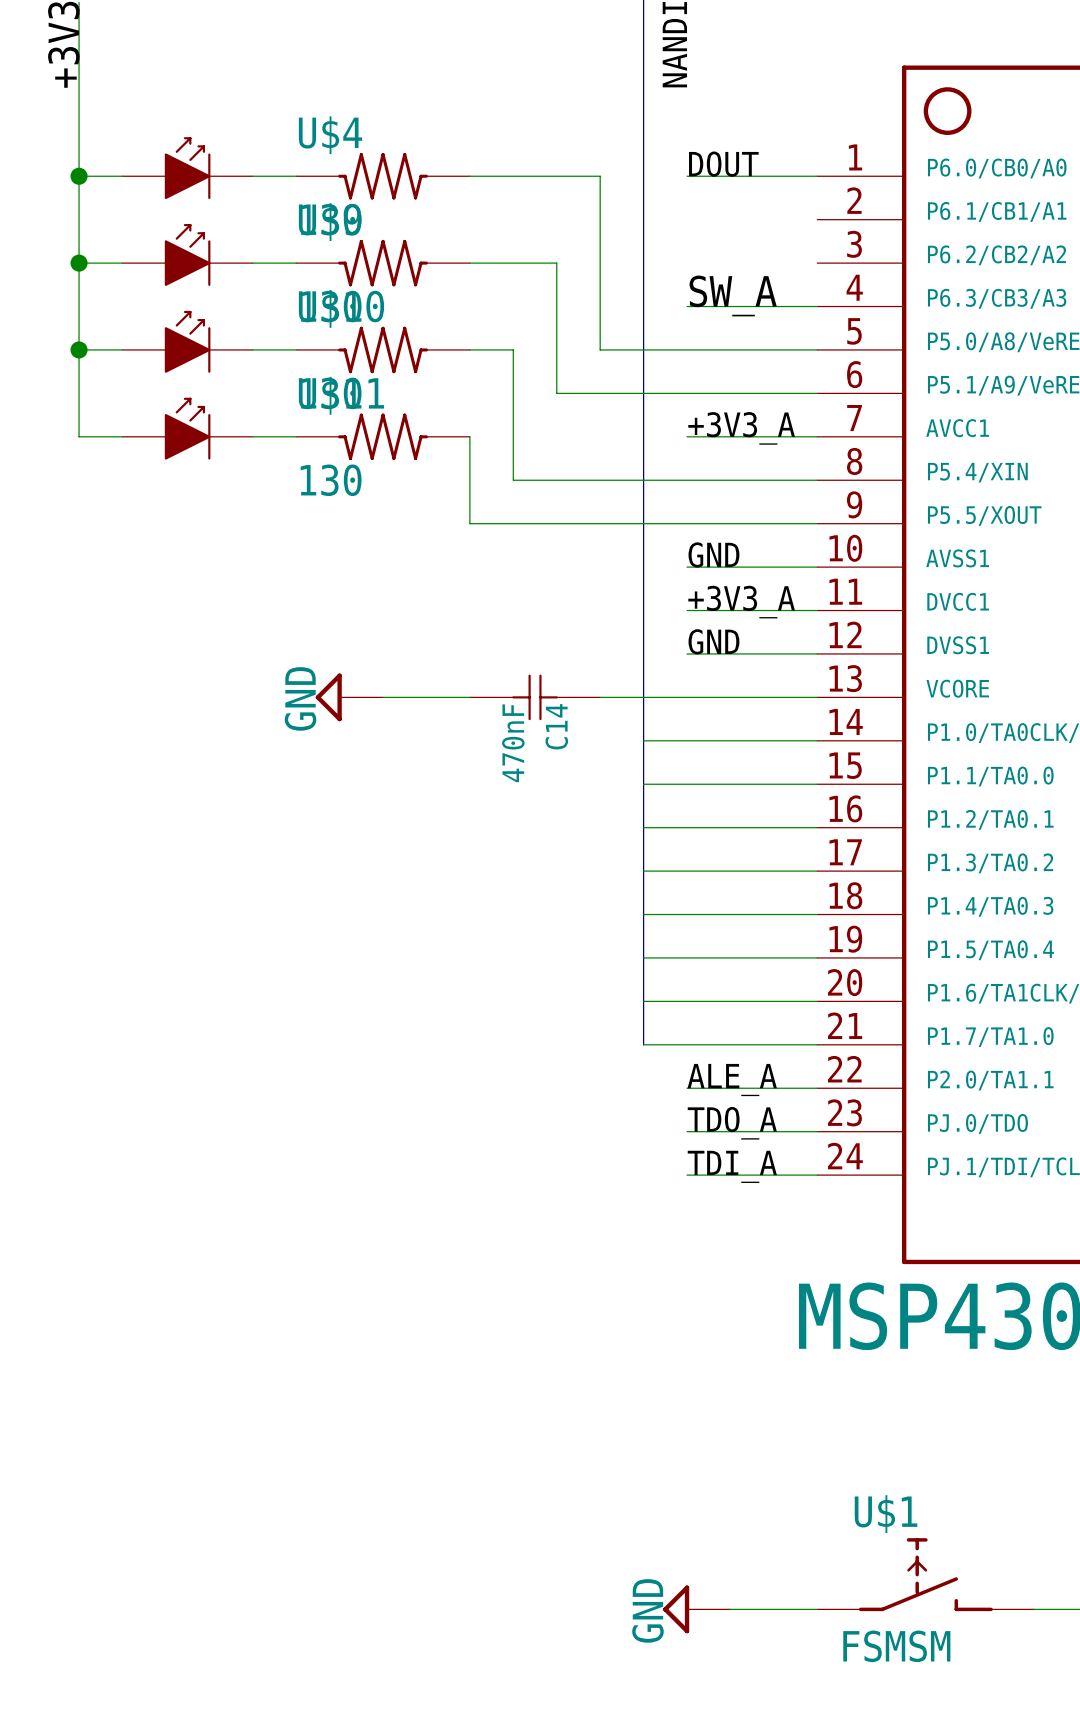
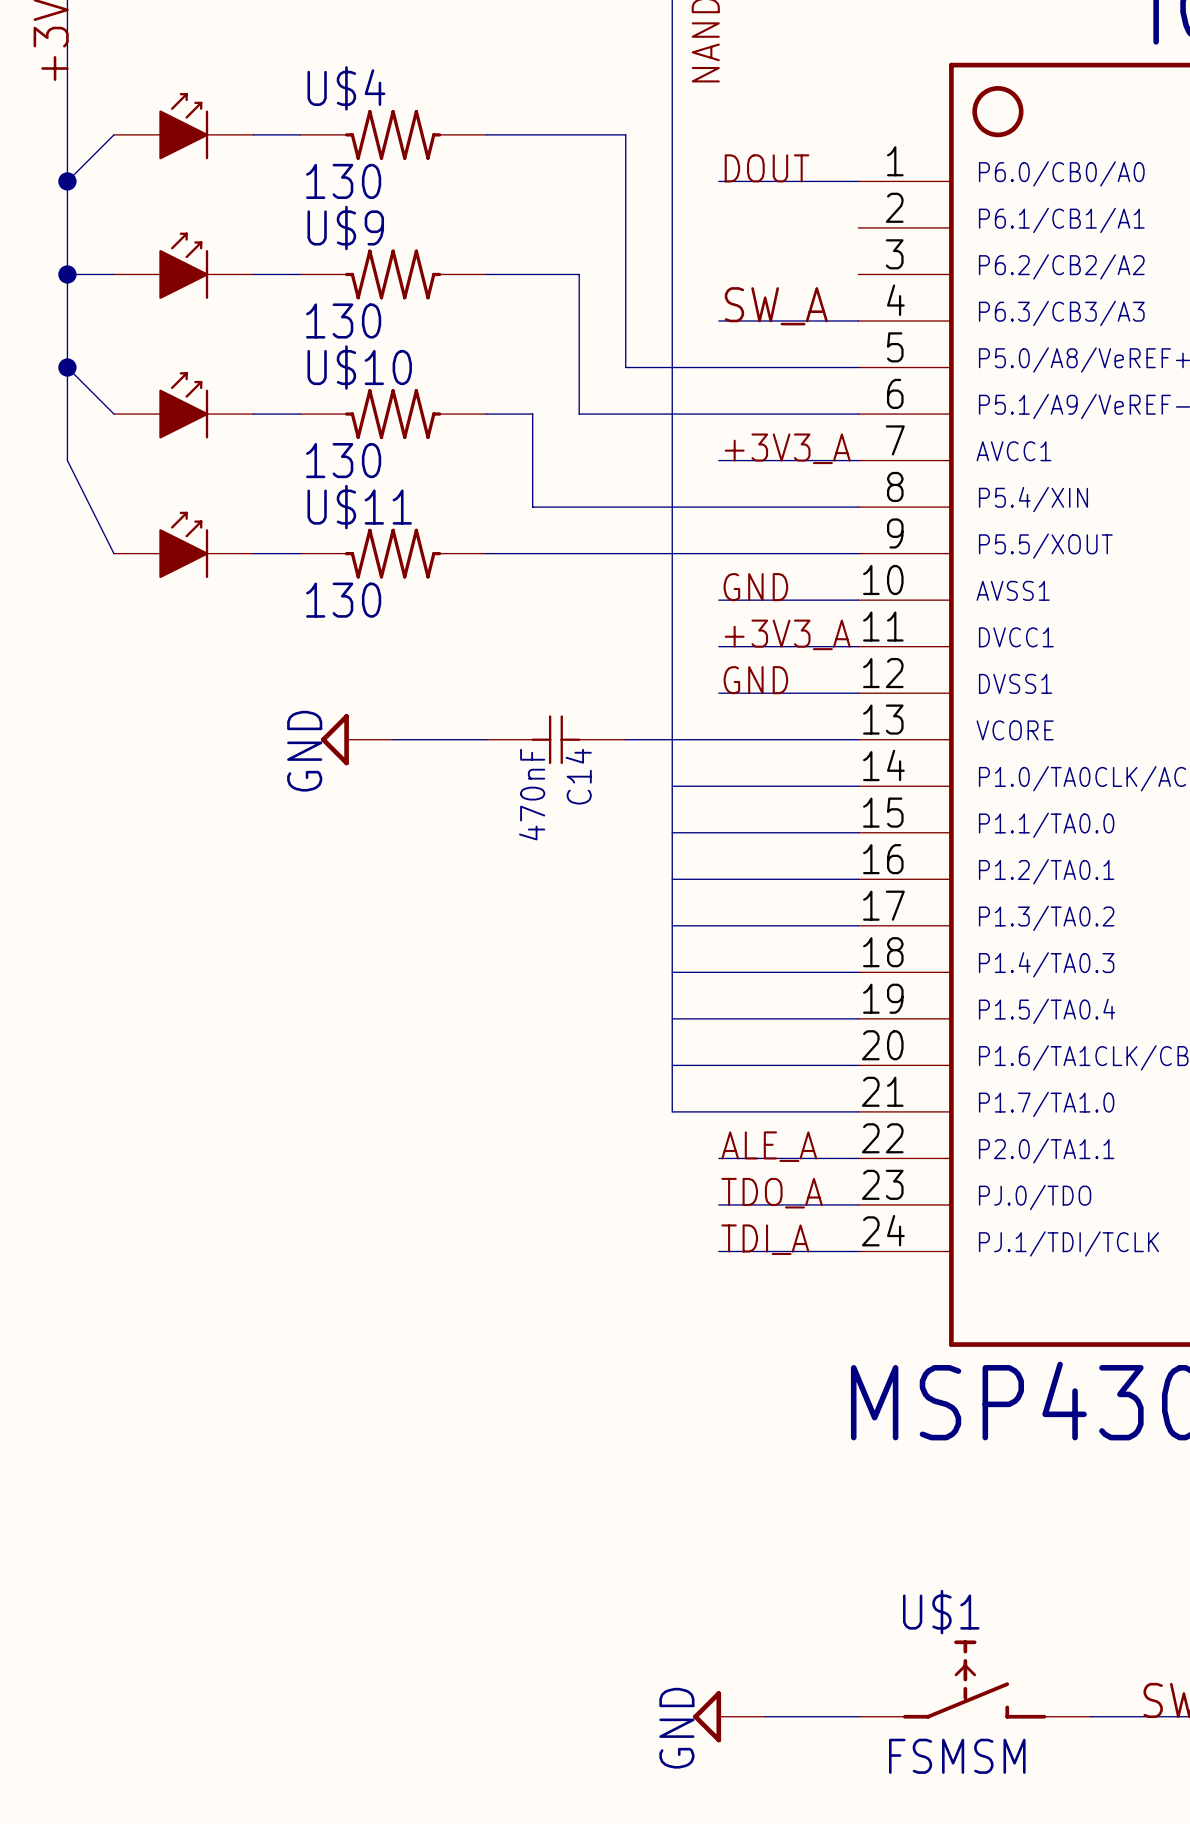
part position: (187, 168) -> (183, 126)
wire: (79, 176) (122, 176) -> (67, 181) (113, 134)
wire: (252, 176) (296, 176) -> (253, 134) (300, 134)
U$4 position: (383, 176) -> (393, 134)
wire: (469, 176) (600, 176) -> (486, 134) (625, 134) (625, 181)
part: (187, 341) -> none
wire: (79, 349) (122, 349) -> (67, 367) (113, 414)
wire: (252, 349) (296, 349) -> (253, 553) (300, 553)
U$10 position: (383, 349) -> (393, 414)
wire: (469, 349) (513, 349) (513, 393) -> (486, 414) (532, 414)
part: none -> (183, 405)
part: (187, 428) -> none
wire: (79, 436) (122, 436) -> (67, 460) (113, 553)
wire: (252, 436) (296, 436) -> (253, 414) (300, 414)
U$11 position: (383, 436) -> (393, 553)
wire: (469, 436) (469, 523) -> none
part: none -> (183, 544)

